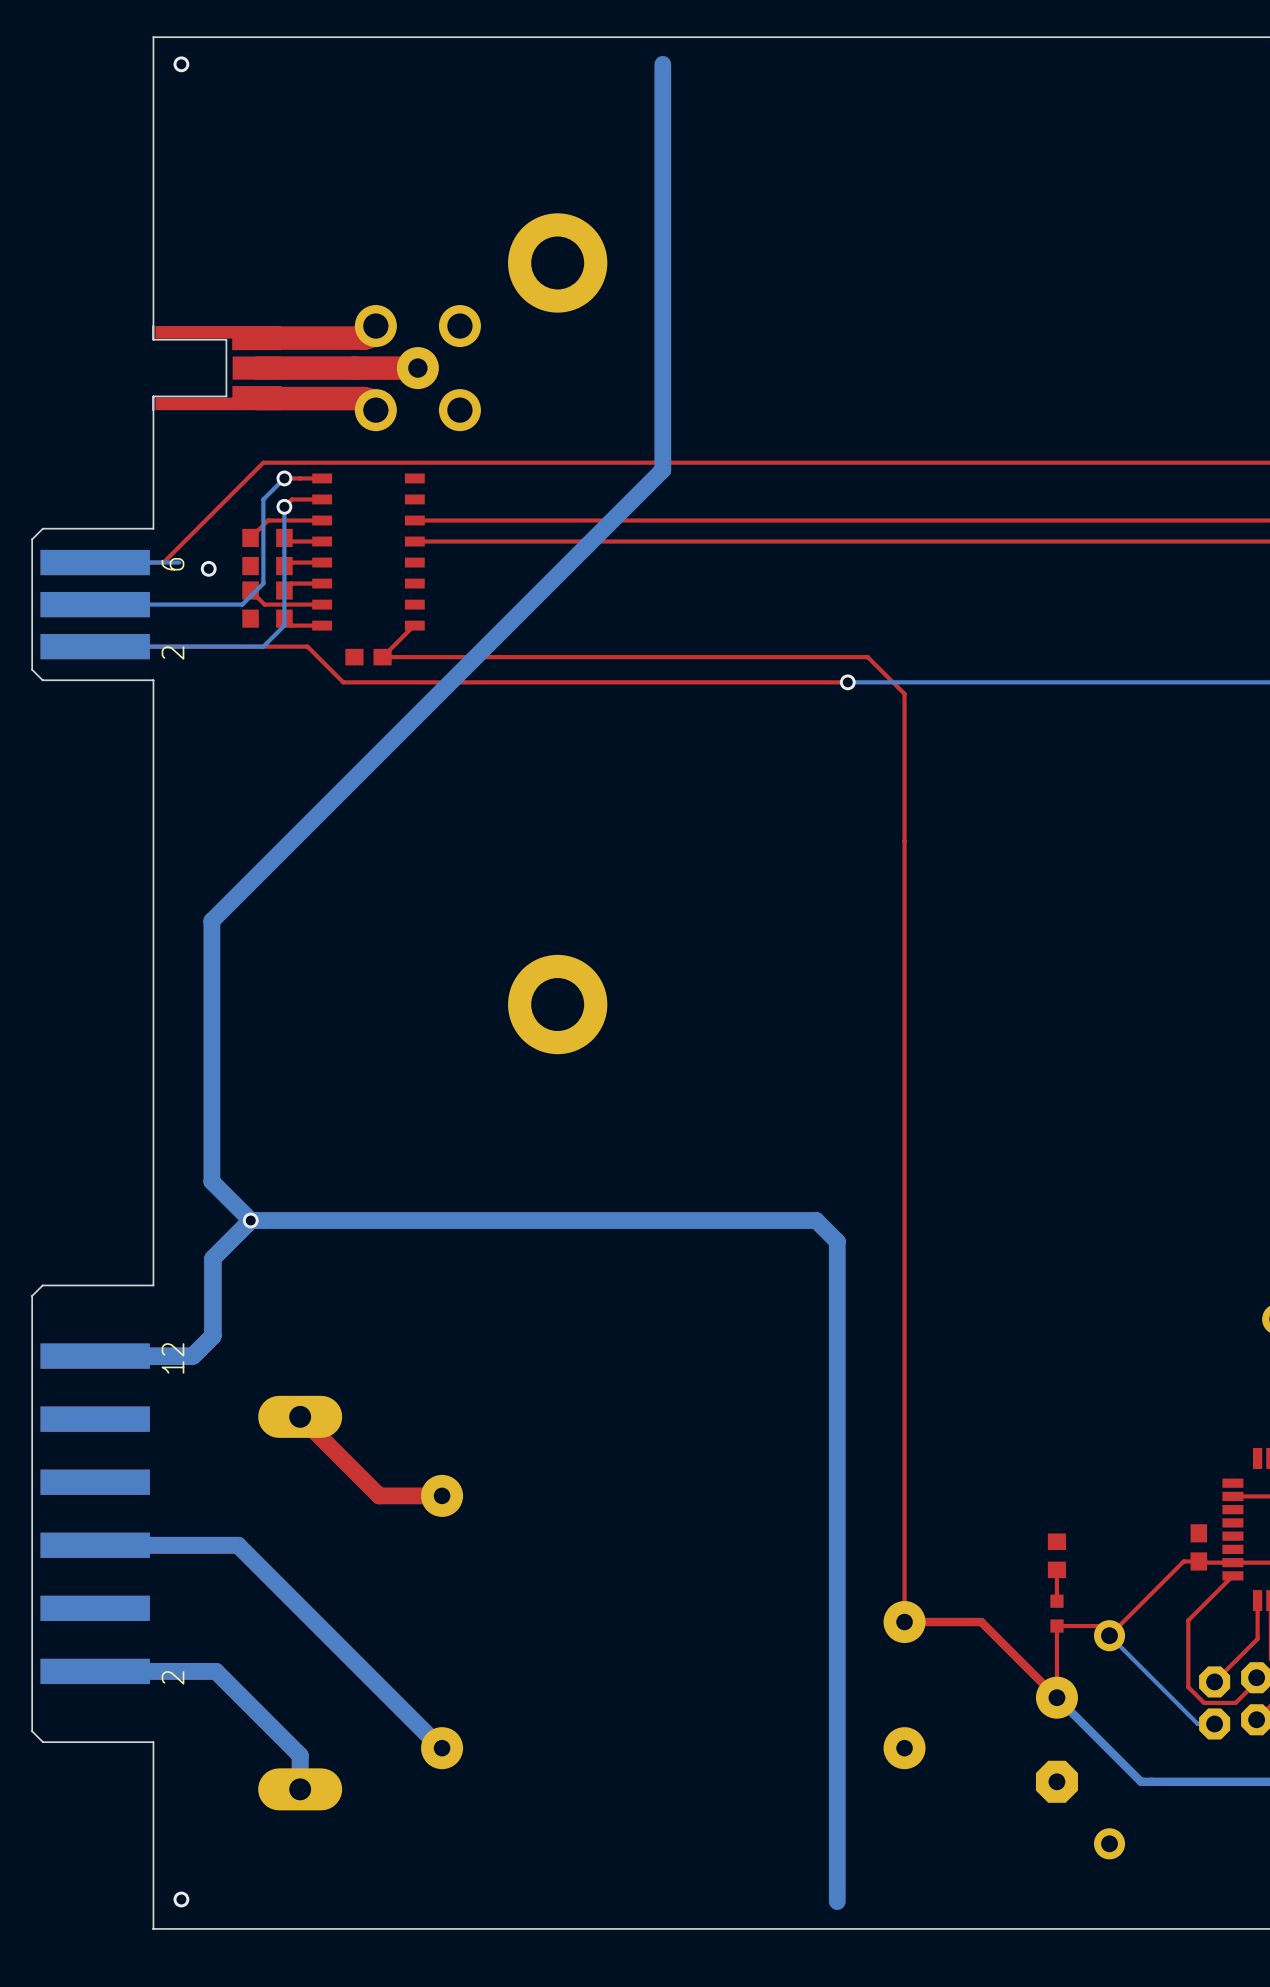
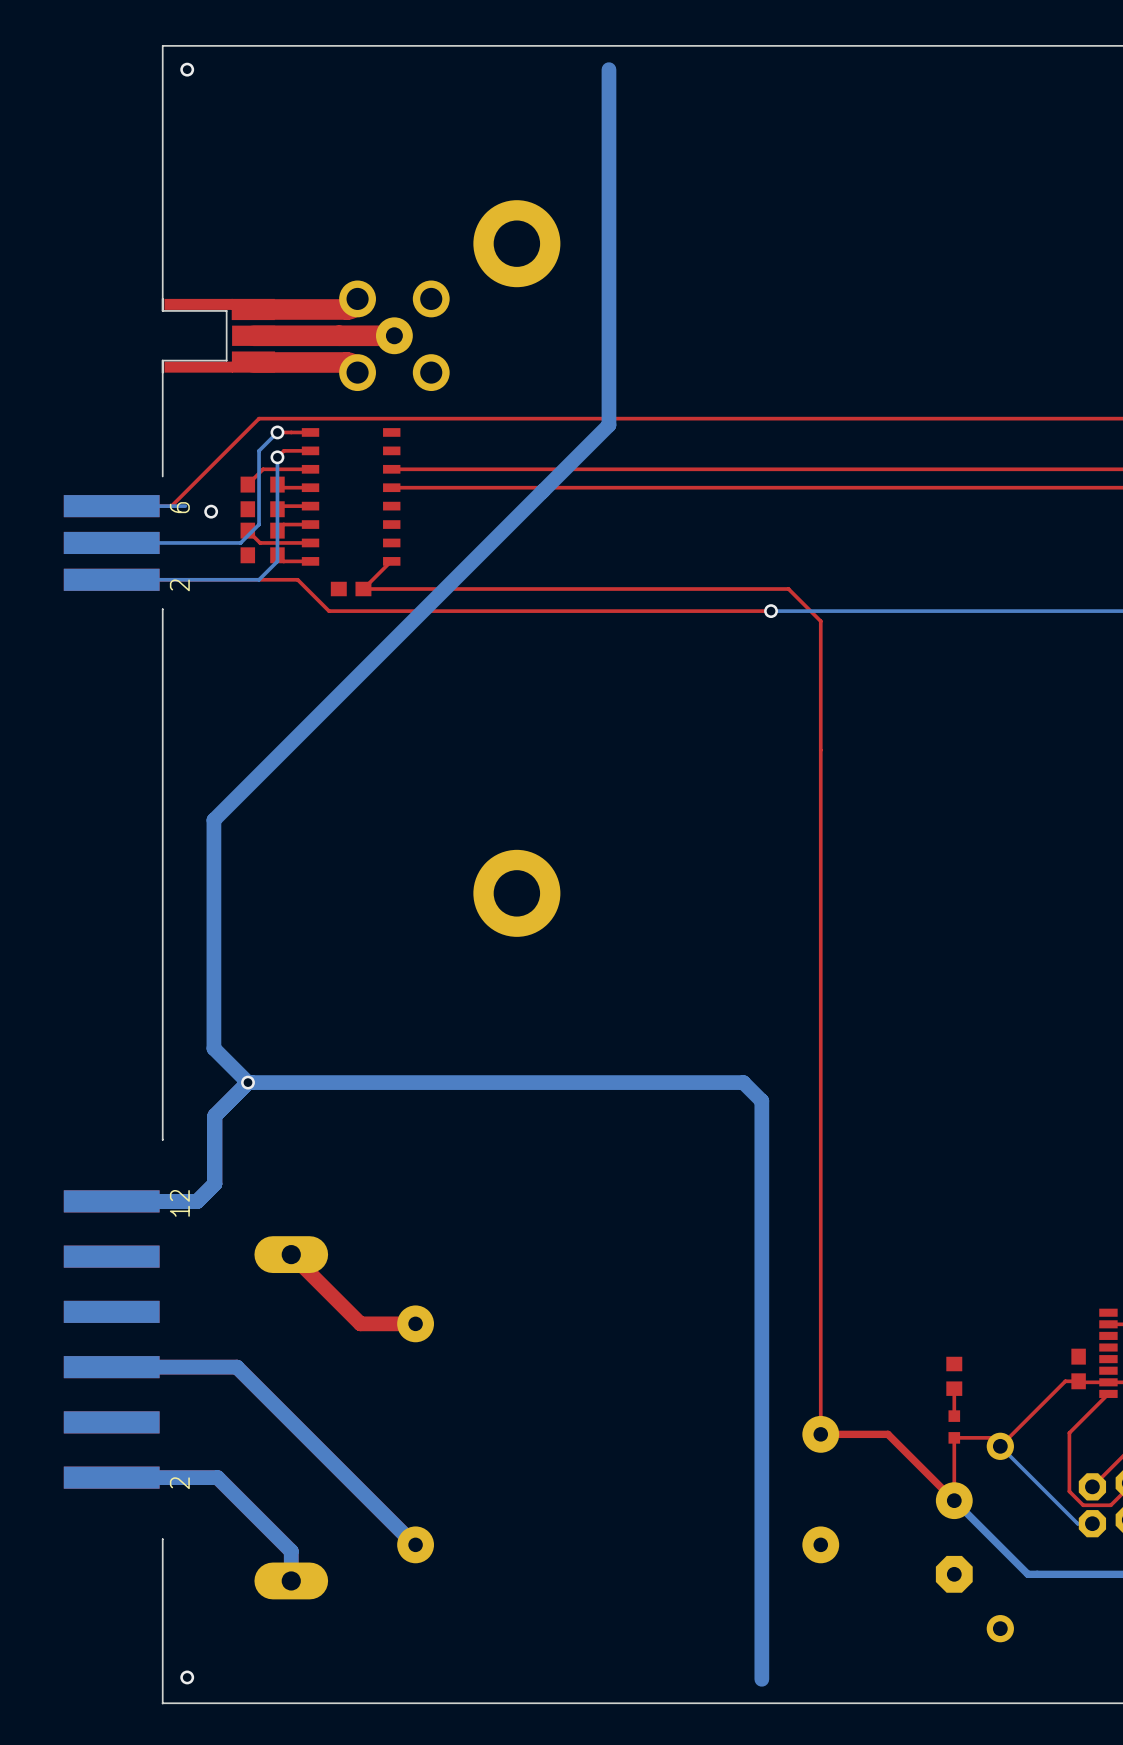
board edge: (42, 528) (32, 539) (32, 669) (42, 680) (153, 680) -> none
board edge: (153, 528) (42, 528) -> none
board edge: (153, 1285) (42, 1285) (32, 1295) (32, 1731) (42, 1741) -> (162, 1139) (162, 1139)
board edge: (153, 1742) (42, 1742) -> (162, 1539) (162, 1539)

